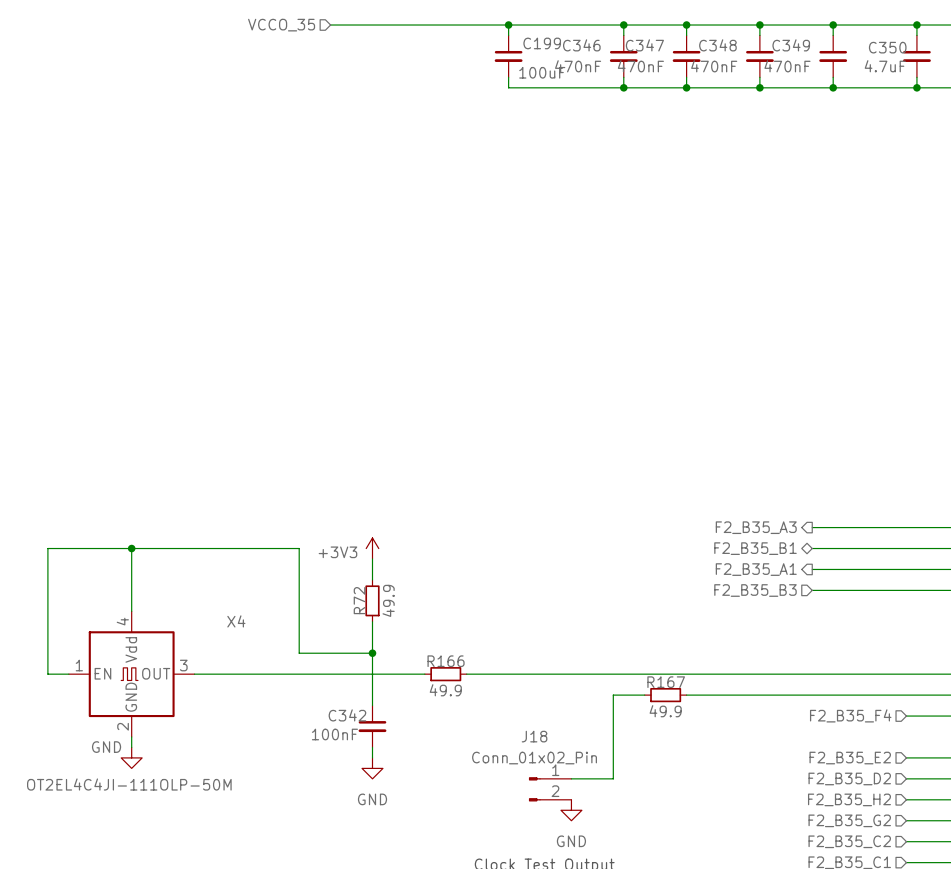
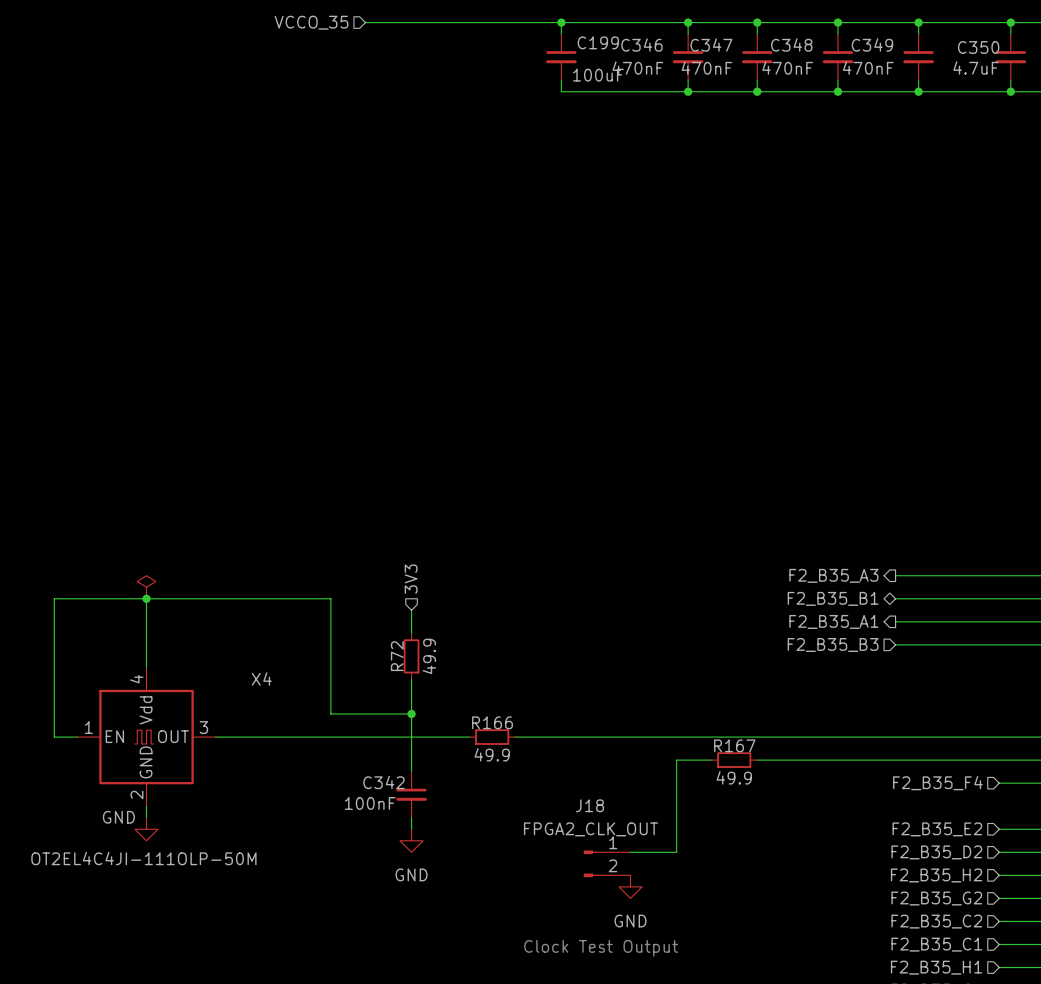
hierarchical label: none -> 3V3 (411, 579)
power symbol: none -> (146, 587)
power symbol: +3V3 (372, 548) -> none
J18 value: Conn_01x02_Pin (534, 758) -> FPGA2_CLK_OUT (591, 829)

